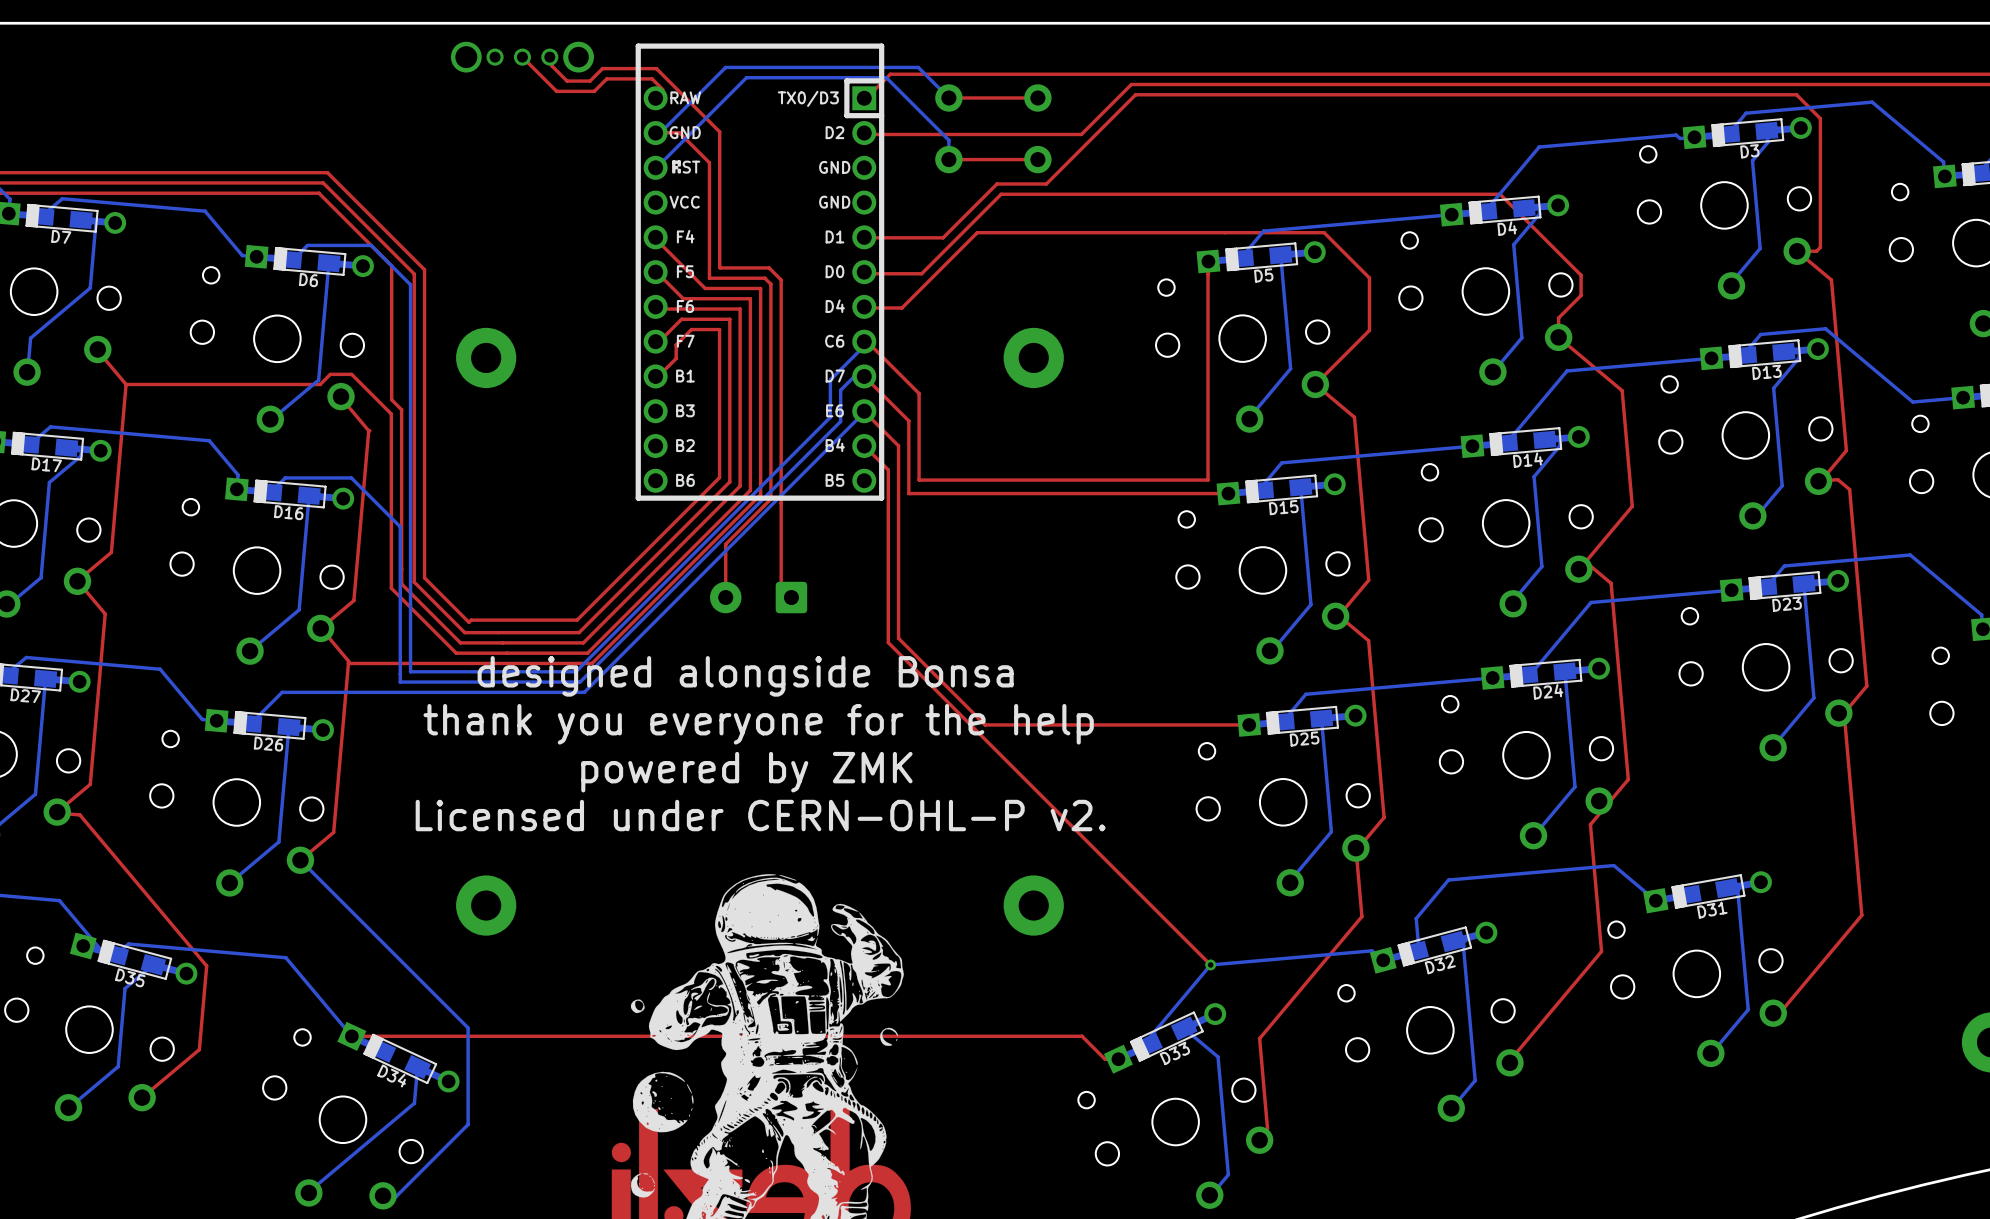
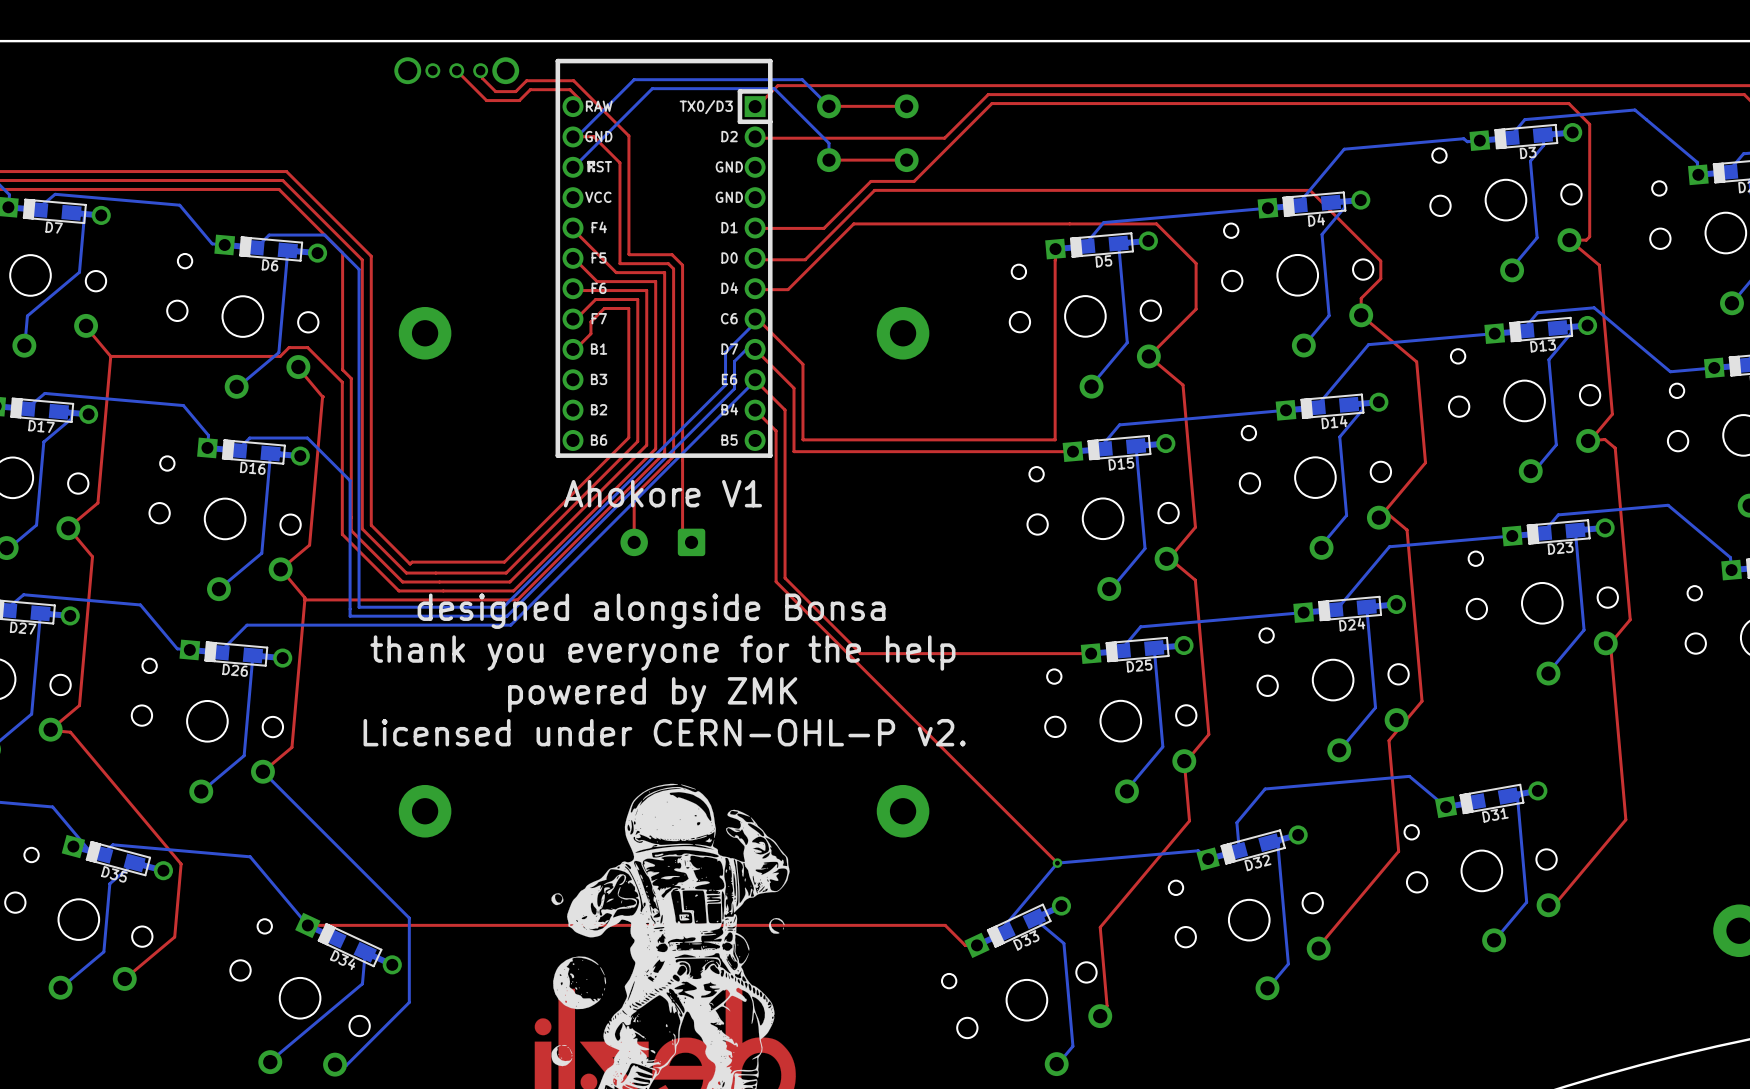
text: none -> Ahokore V1 (662, 493)

